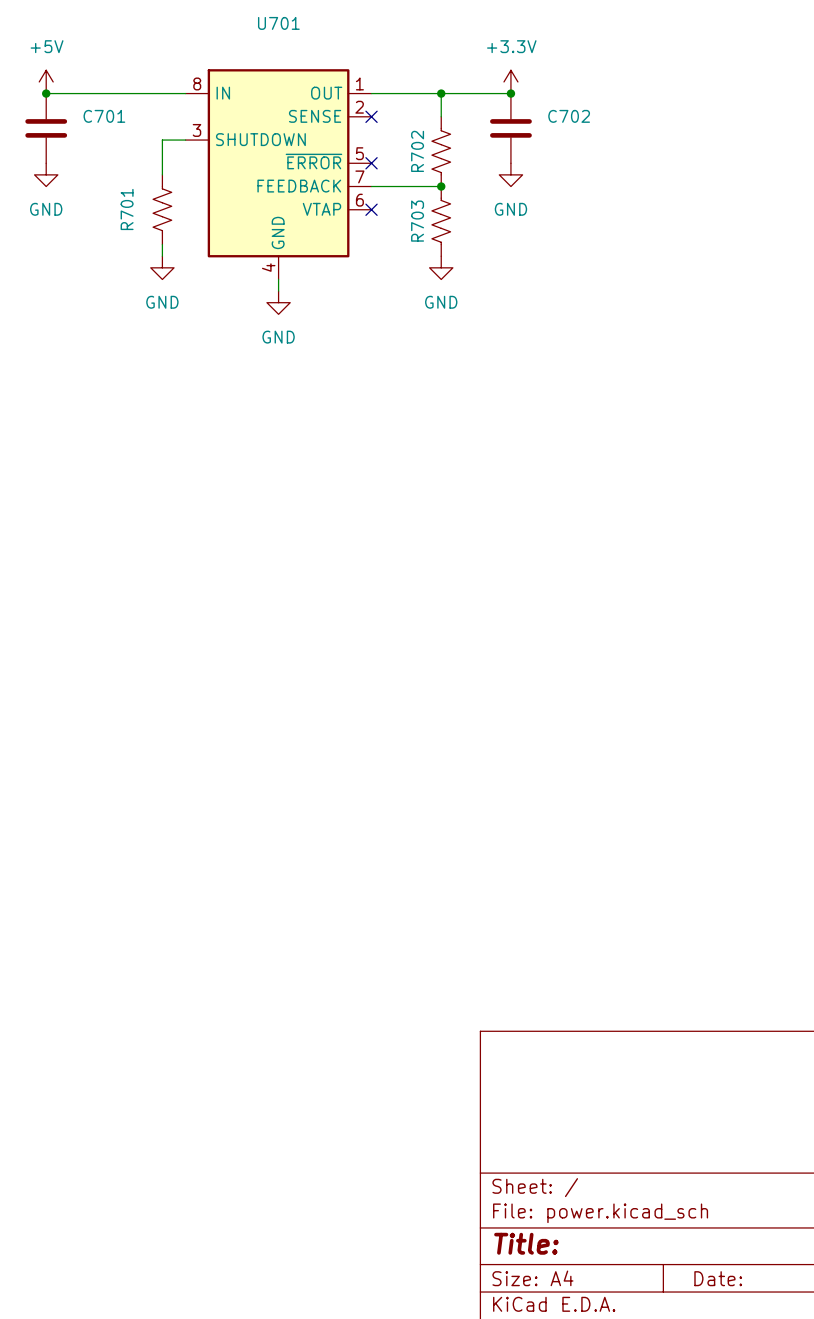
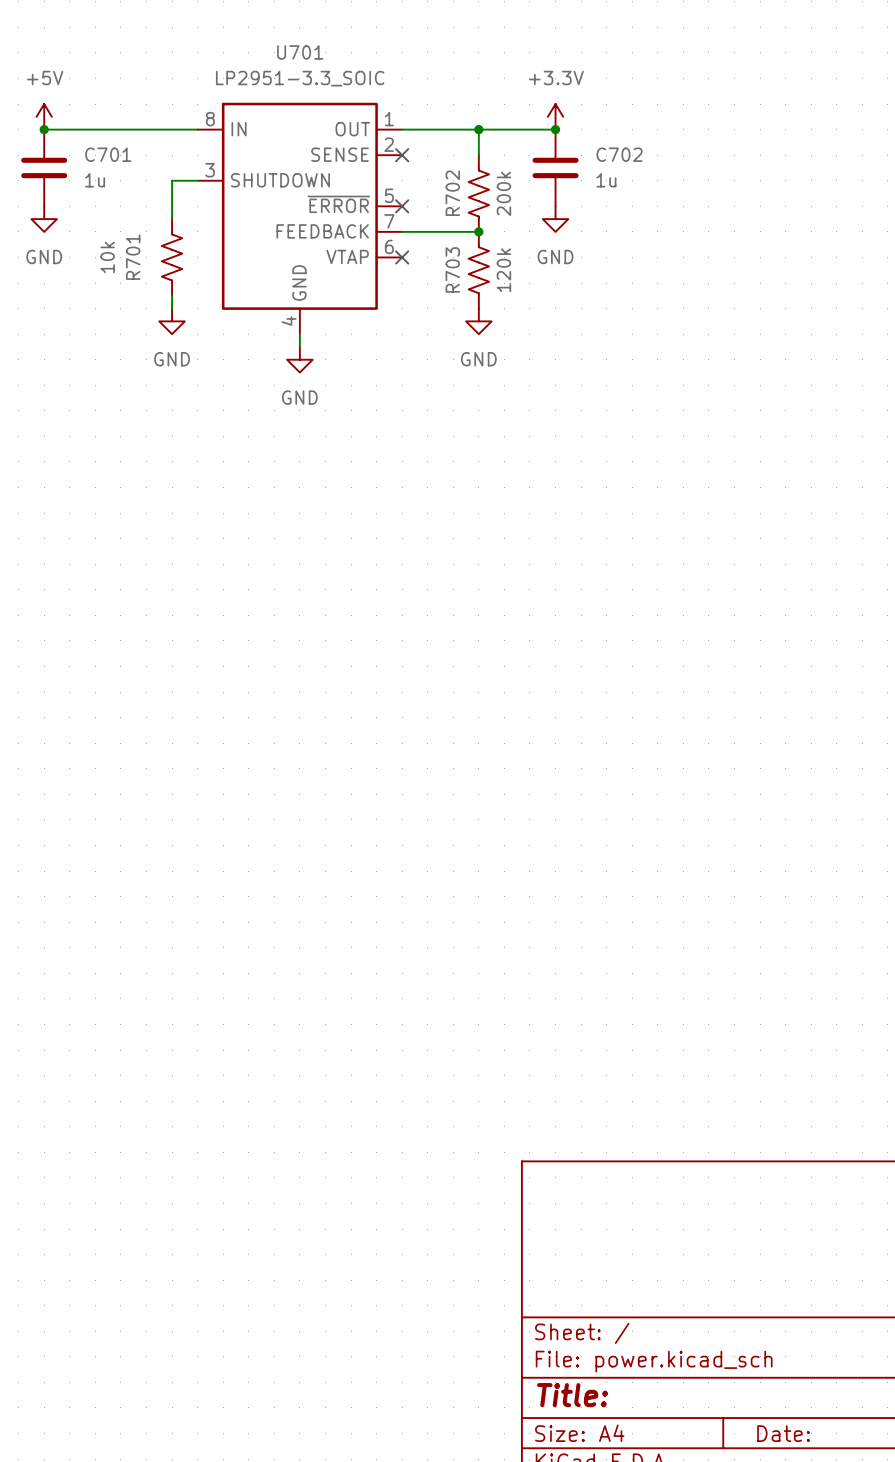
U701 value: none -> LP2951-3.3_SOIC (300, 78)
C701 value: none -> 1u (95, 180)
C702 value: none -> 1u (606, 180)
R702 value: none -> 200k (503, 193)
R701 value: none -> 10k (107, 257)
R703 value: none -> 120k (503, 270)

